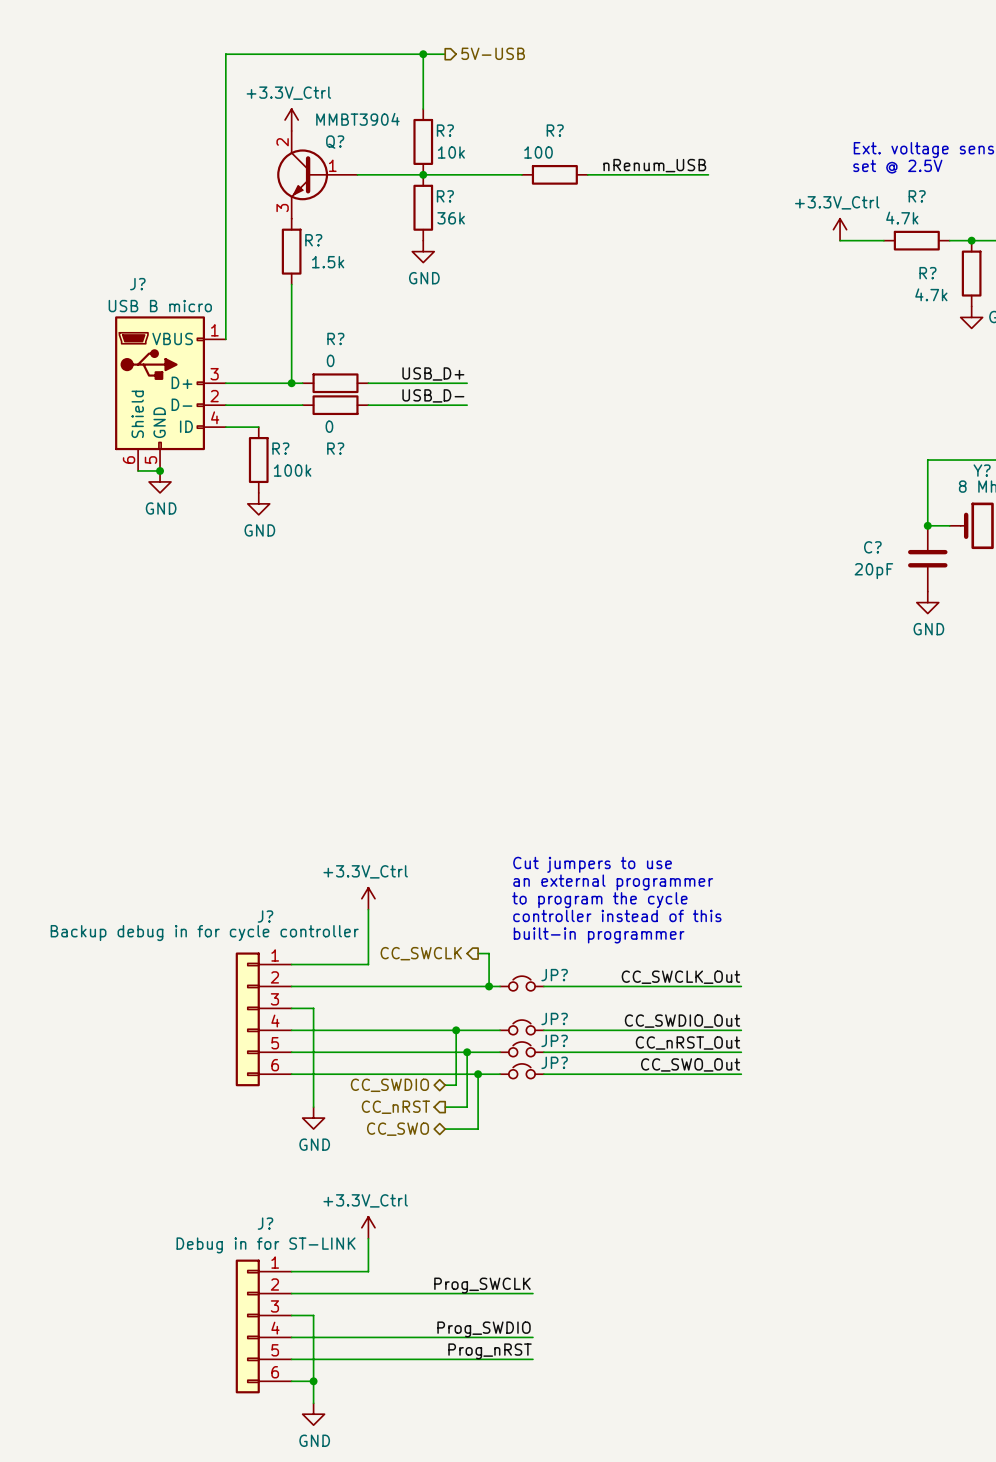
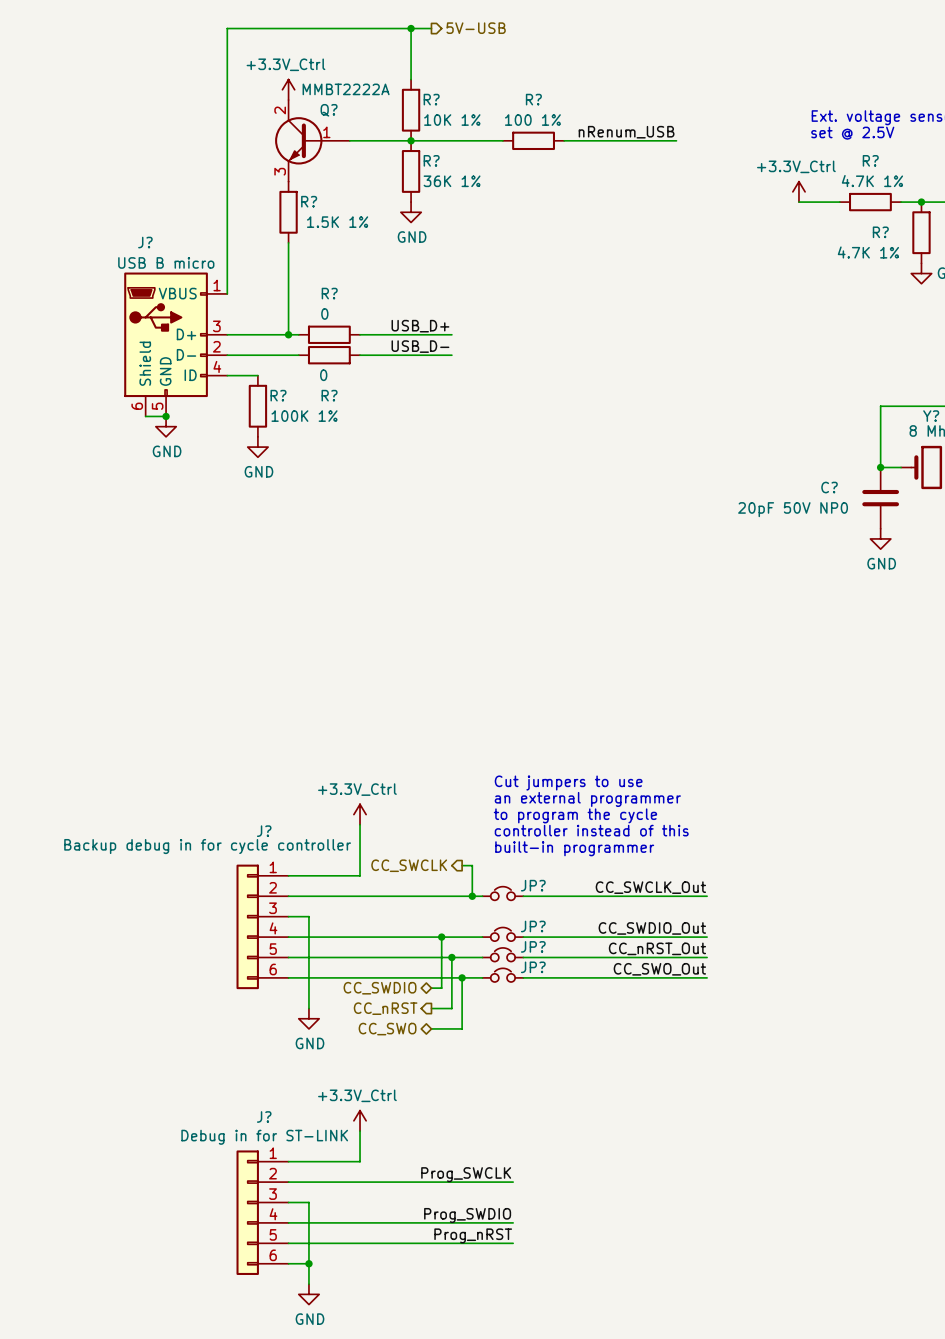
Q? value: MMBT3904 (357, 119) -> MMBT2222A (346, 89)
R? value: 10k (451, 152) -> 10K 1% (452, 120)
R? value: 100 (538, 152) -> 100 1% (532, 120)
R? value: 36k (451, 218) -> 36K 1% (452, 181)
R? value: 4.7k (902, 218) -> 4.7K 1% (872, 181)
R? value: 1.5k (328, 262) -> 1.5K 1% (337, 222)
R? value: 4.7k (931, 294) -> 4.7K 1% (868, 252)
R? value: 100k (292, 470) -> 100K 1% (304, 416)
C? value: 20pF (873, 571) -> 20pF 50V NP0 (793, 509)

